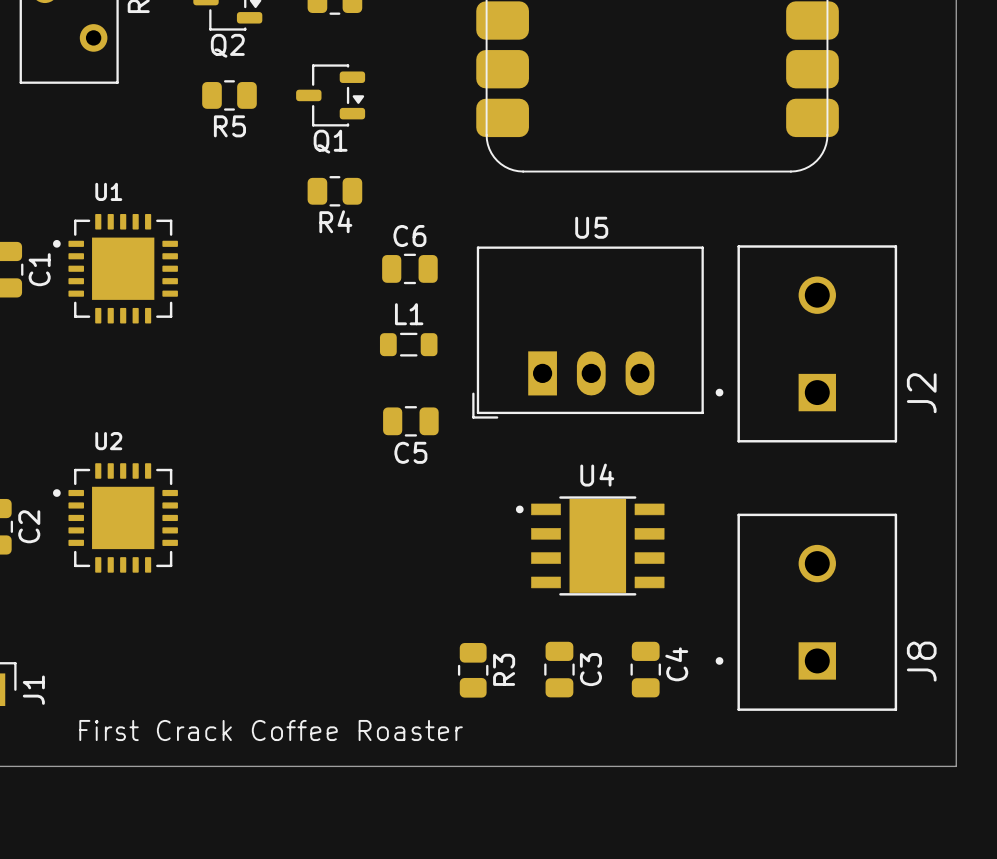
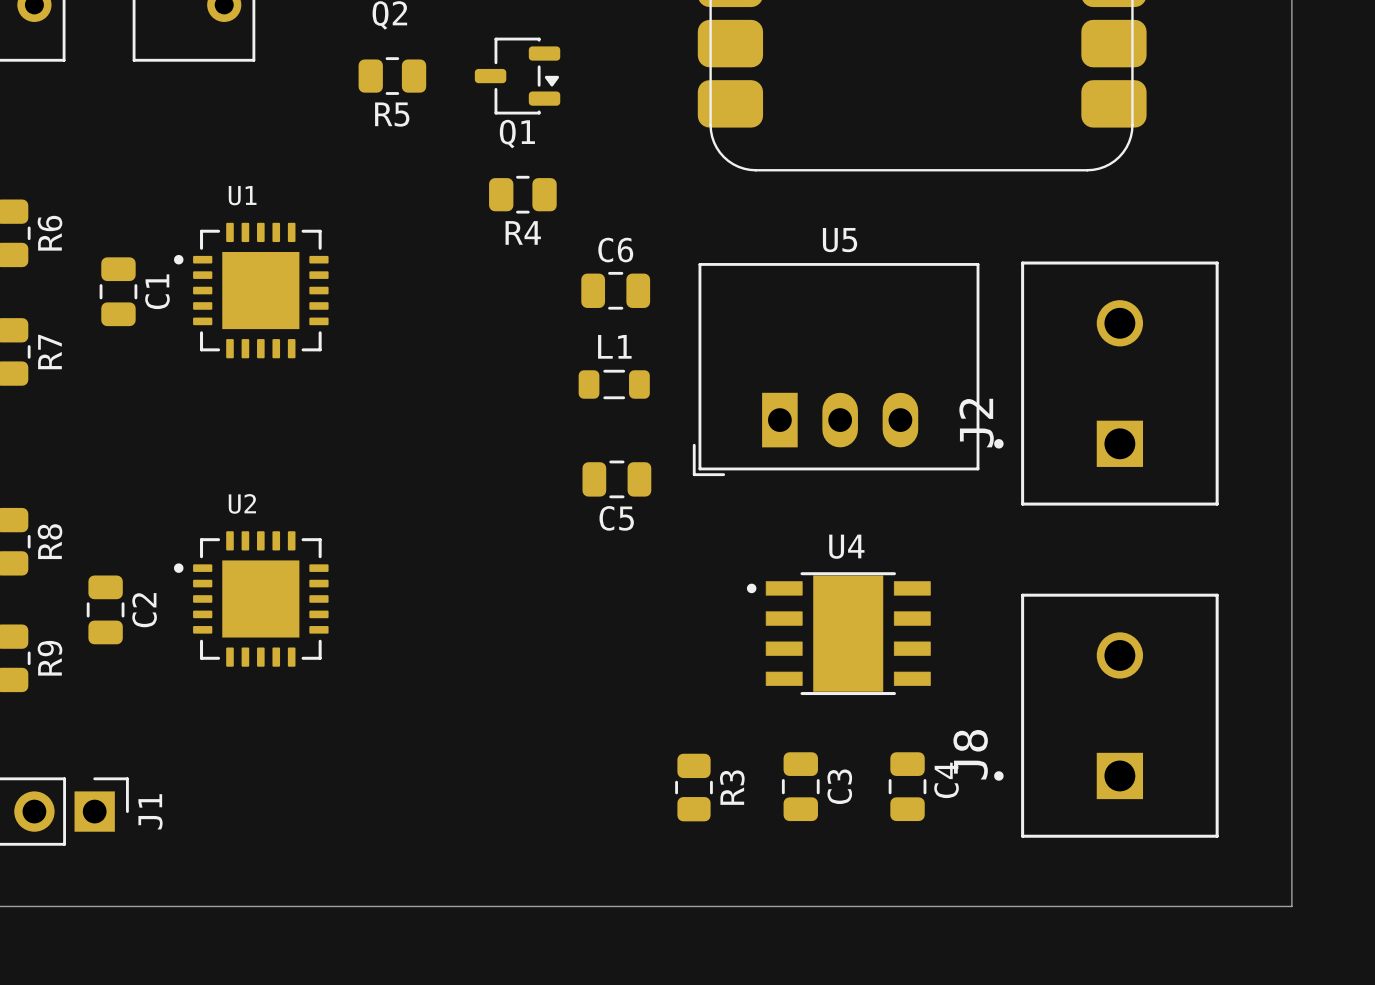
J2 name position: J2 (921, 393) -> J2 (976, 423)
J8 name position: J8 (921, 661) -> J8 (970, 754)
text: First Crack Coffee Roaster (271, 730) -> none

